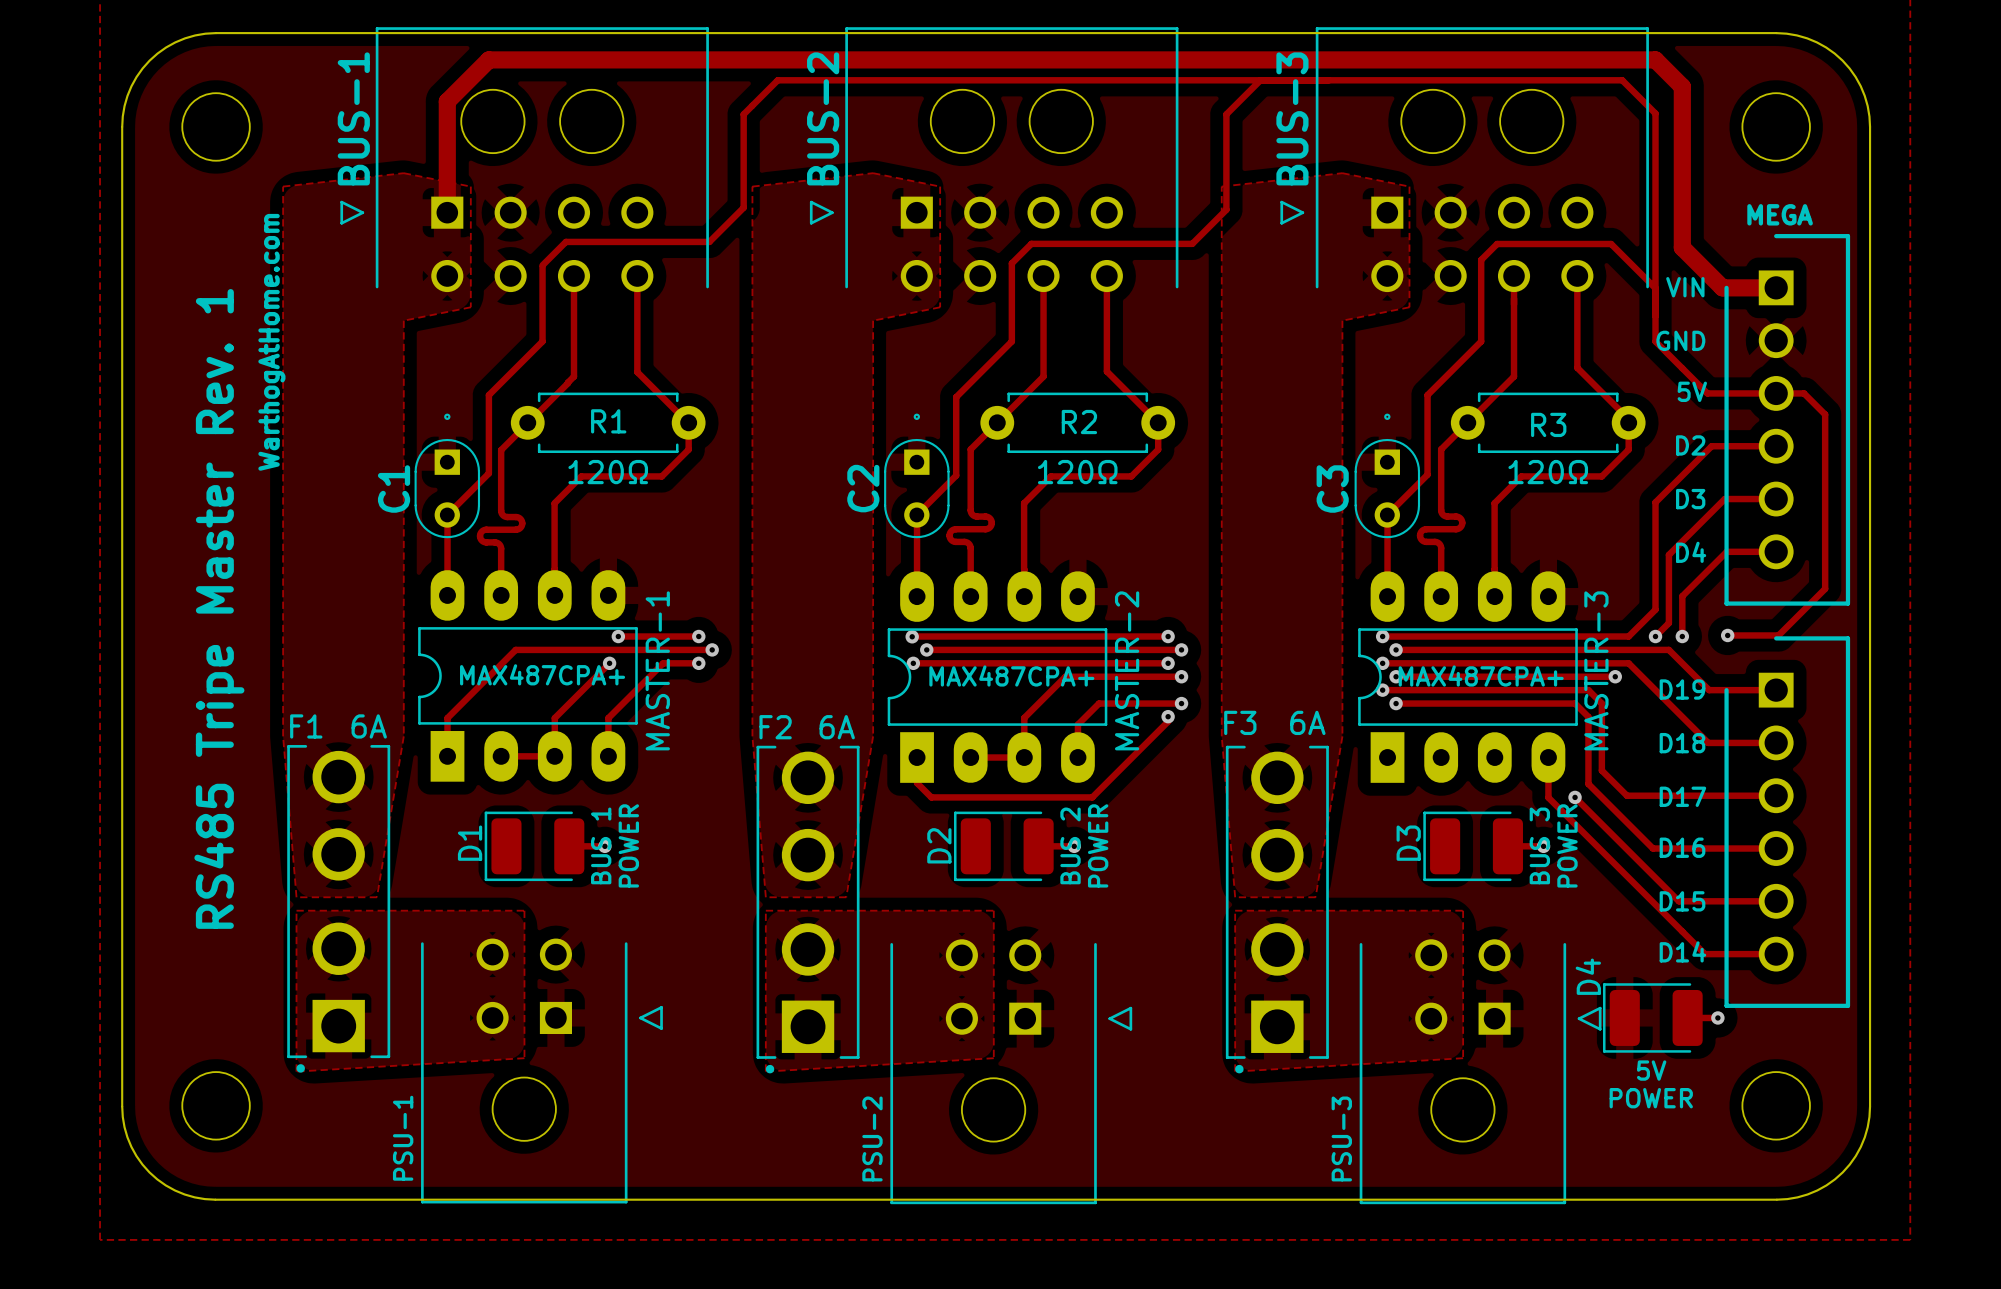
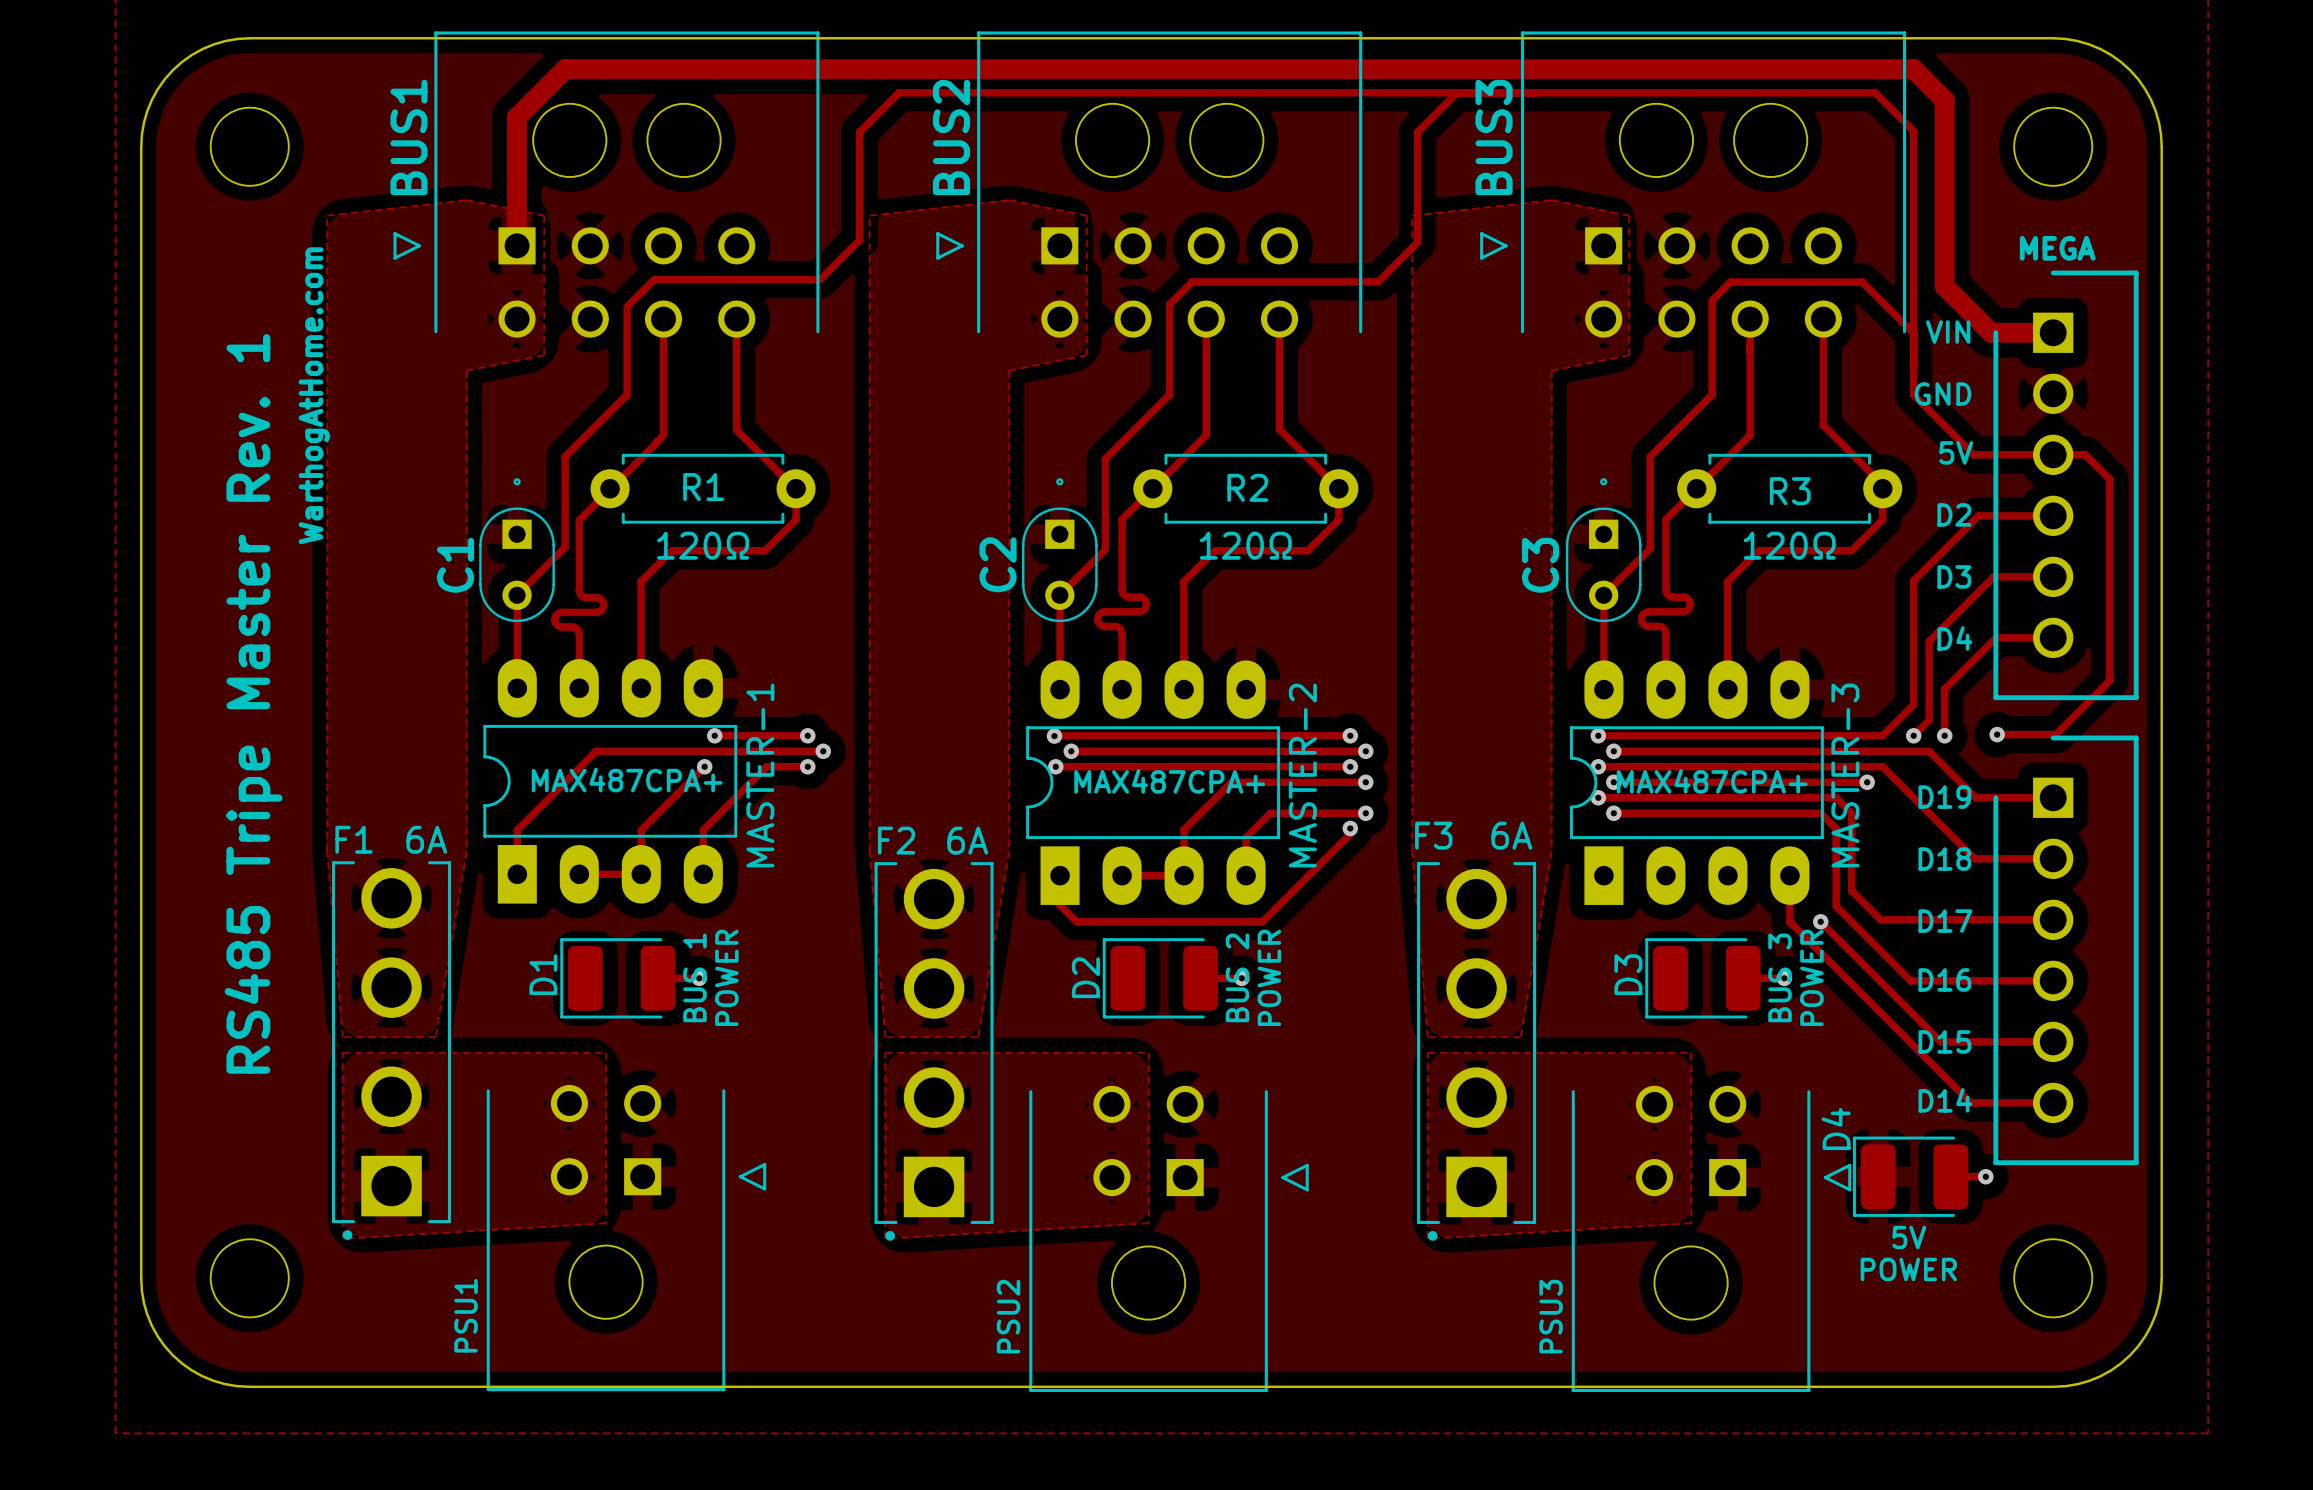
BUS-1 name: BUS-1 (353, 118) -> BUS1 (408, 137)
BUS-2 name: BUS-2 (823, 118) -> BUS2 (951, 137)
BUS-3 name: BUS-3 (1292, 118) -> BUS3 (1494, 137)
PSU-1 name: PSU-1 (403, 1138) -> PSU1 (466, 1315)
PSU-2 name: PSU-2 (872, 1138) -> PSU2 (1008, 1316)
PSU-3 name: PSU-3 (1341, 1138) -> PSU3 (1551, 1316)

